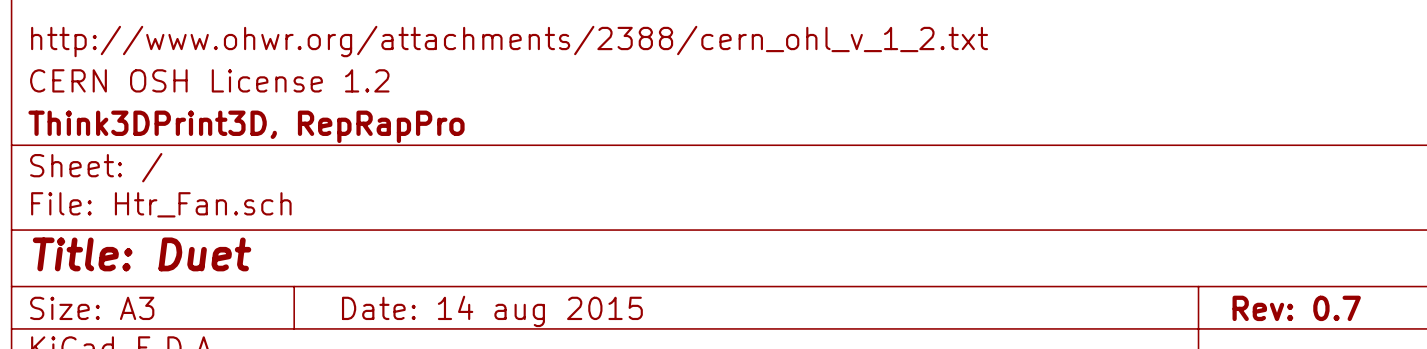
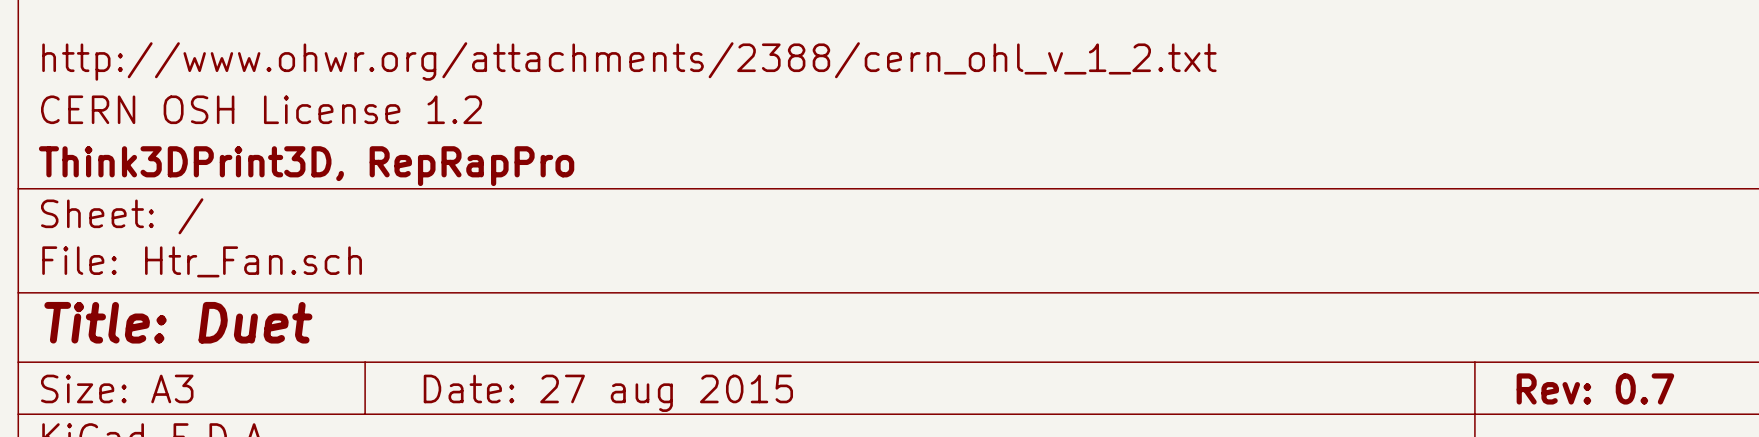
title block: Date: 14 aug 2015 (492, 311) -> Date: 27 aug 2015 (608, 393)

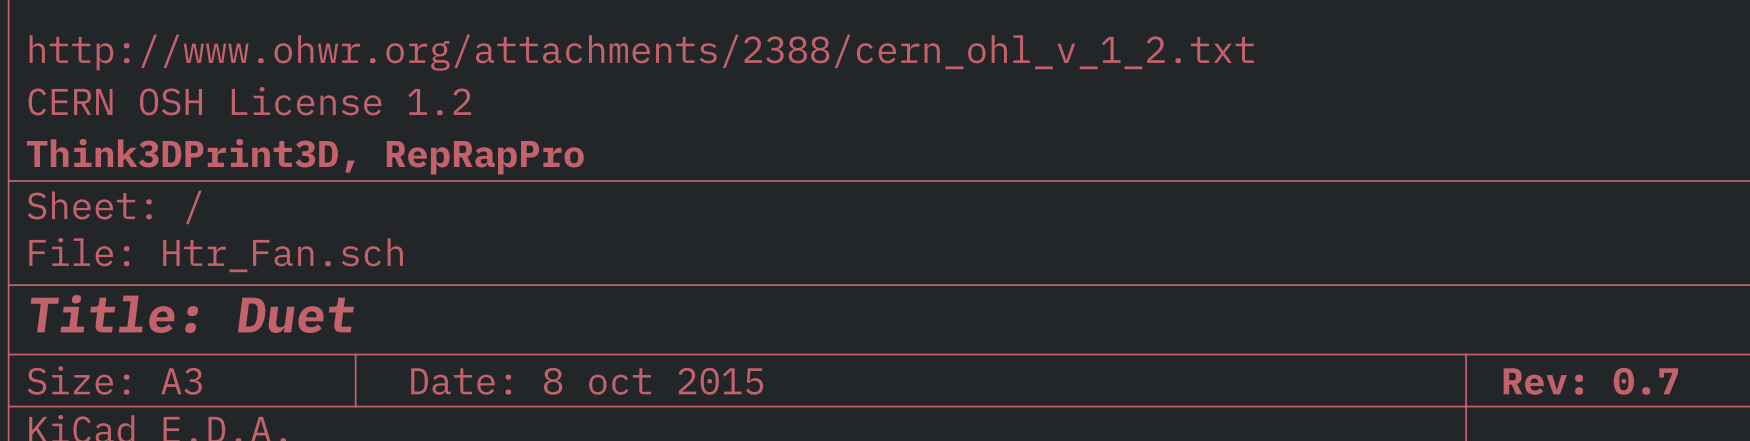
title block: Date: 27 aug 2015 (608, 393) -> Date: 8 oct 2015 (587, 381)

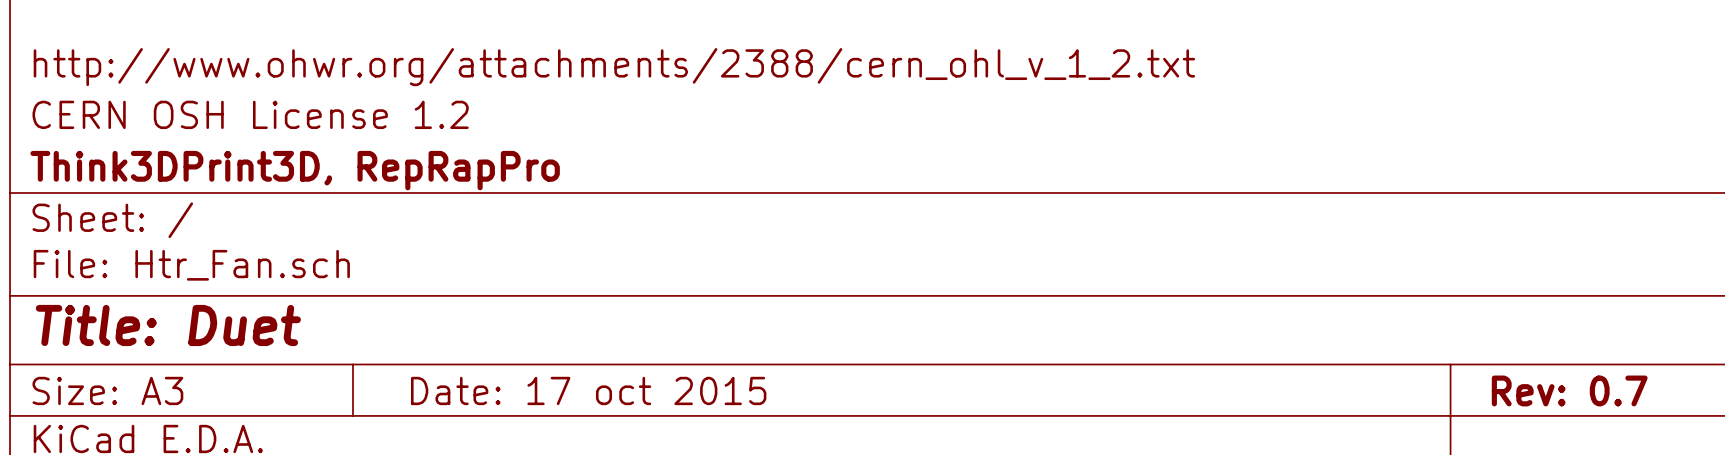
title block: Date: 8 oct 2015 (587, 381) -> Date: 17 oct 2015 (588, 390)

